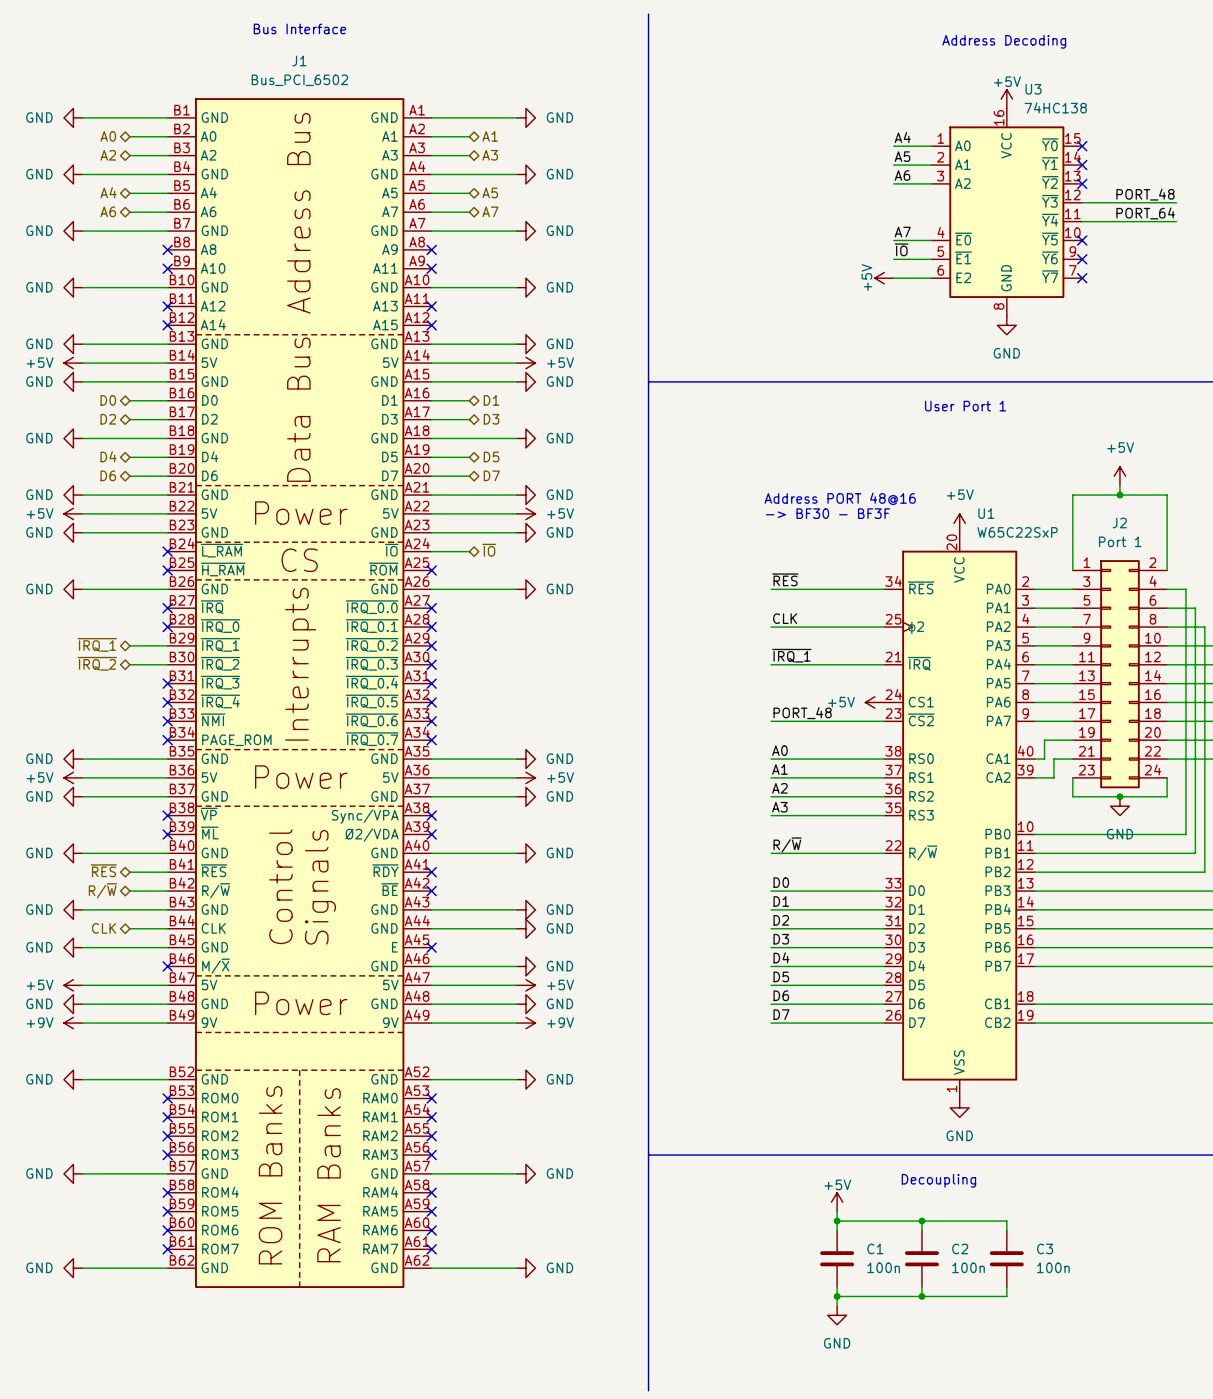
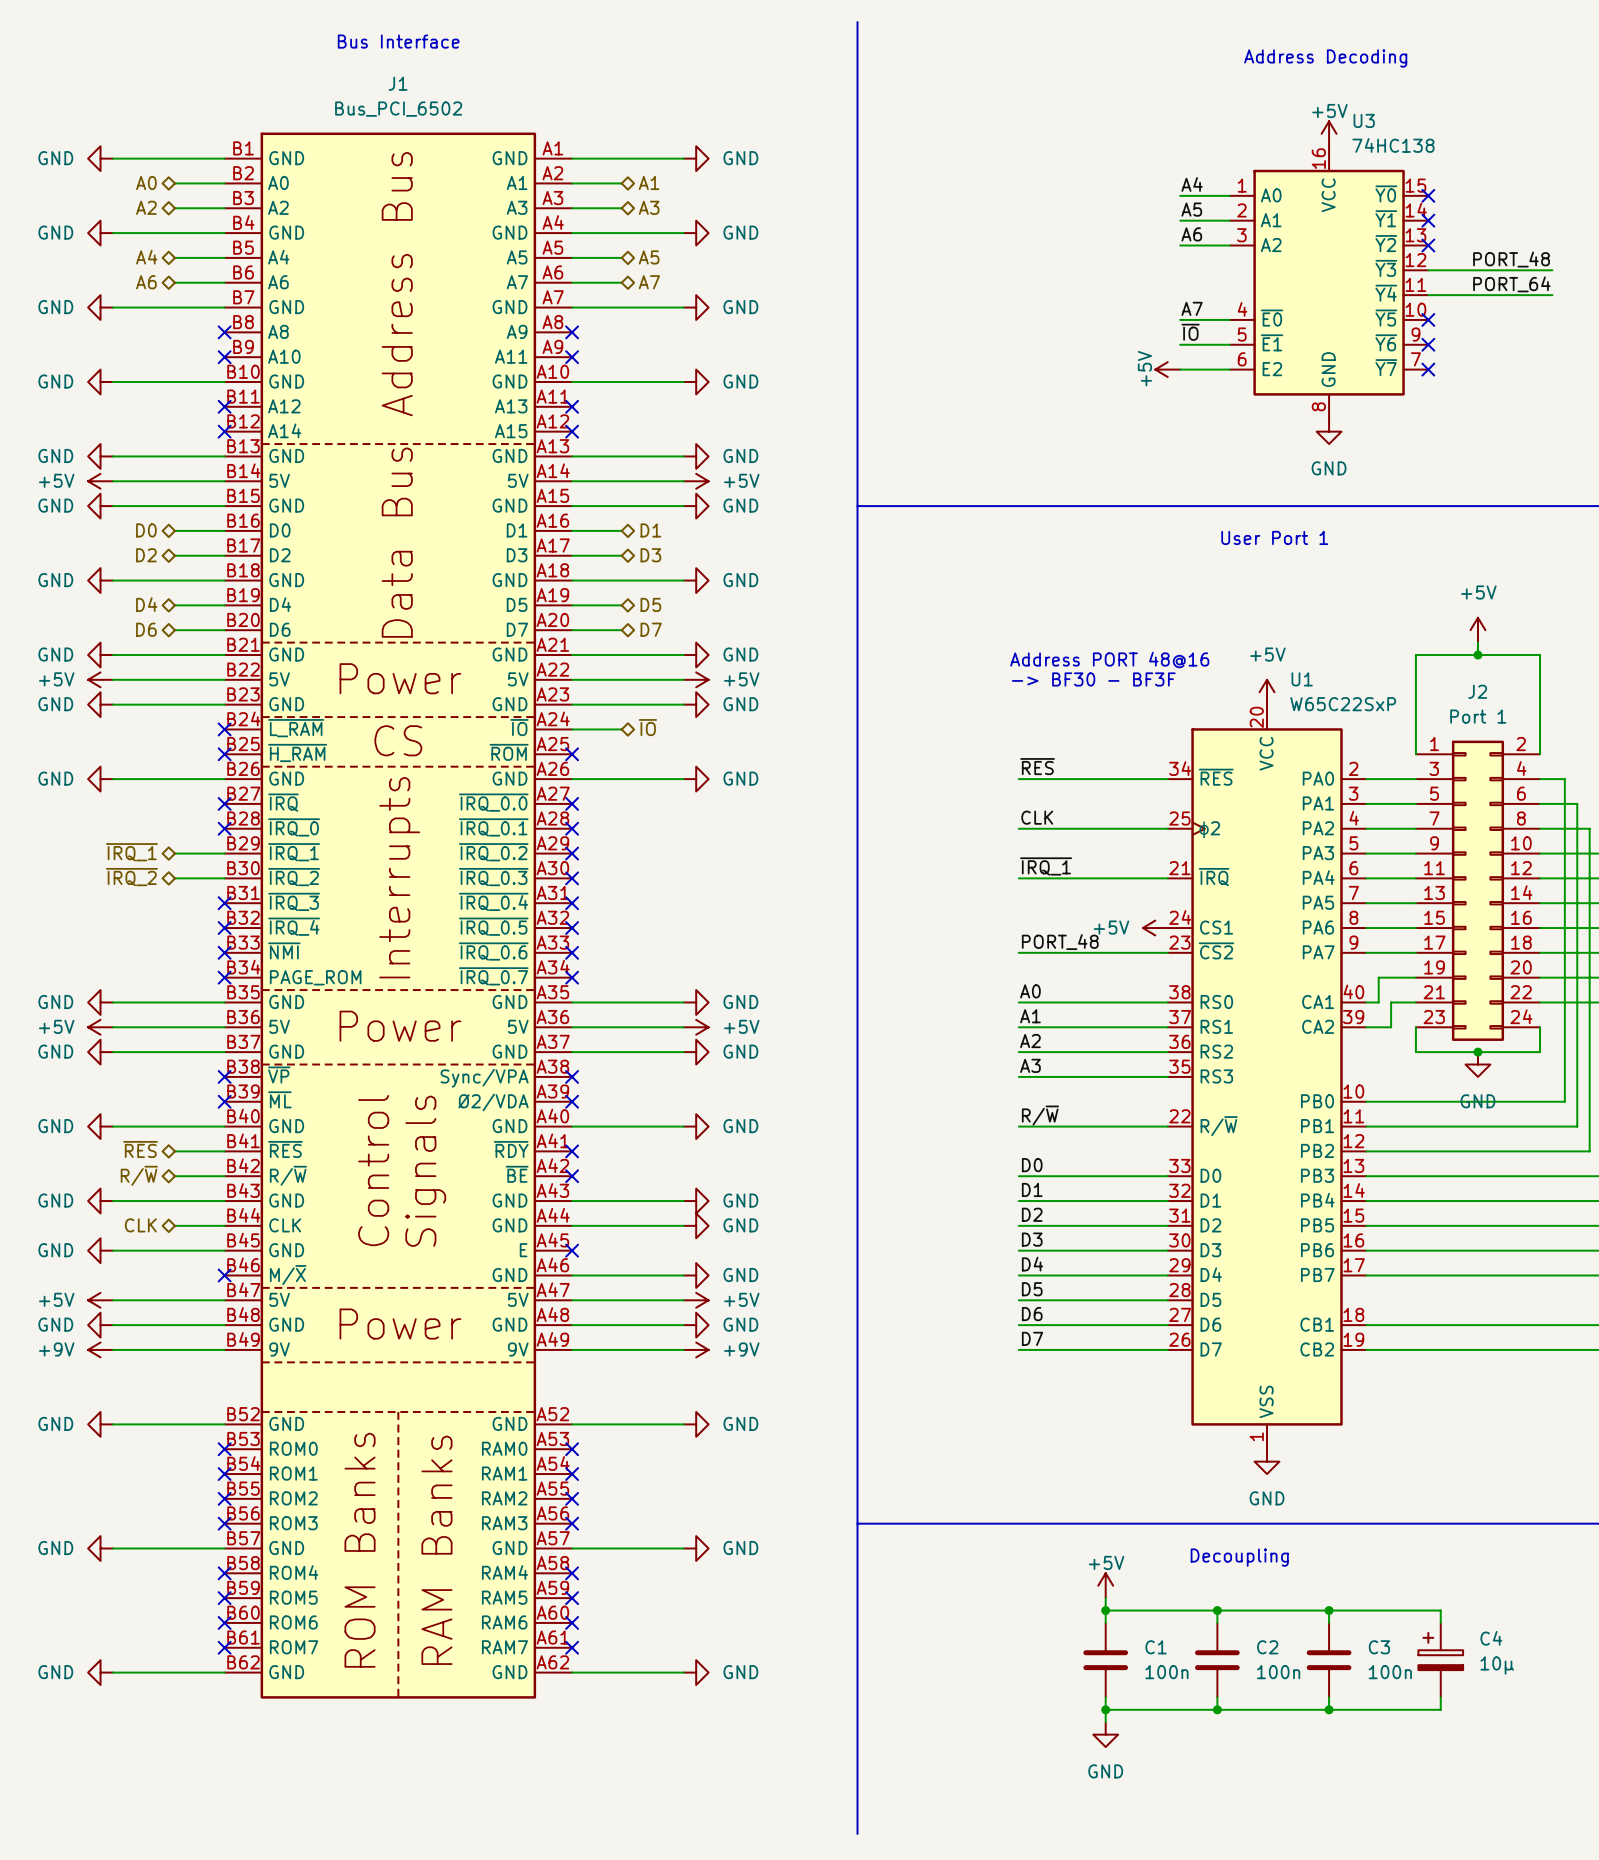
wire: none -> (1329, 1610) (1440, 1610) (1440, 1622)
junction: none -> (1329, 1610)
C4: none -> 10µ (1440, 1660)
wire: none -> (1440, 1697) (1440, 1709) (1329, 1709)
junction: none -> (1329, 1709)

